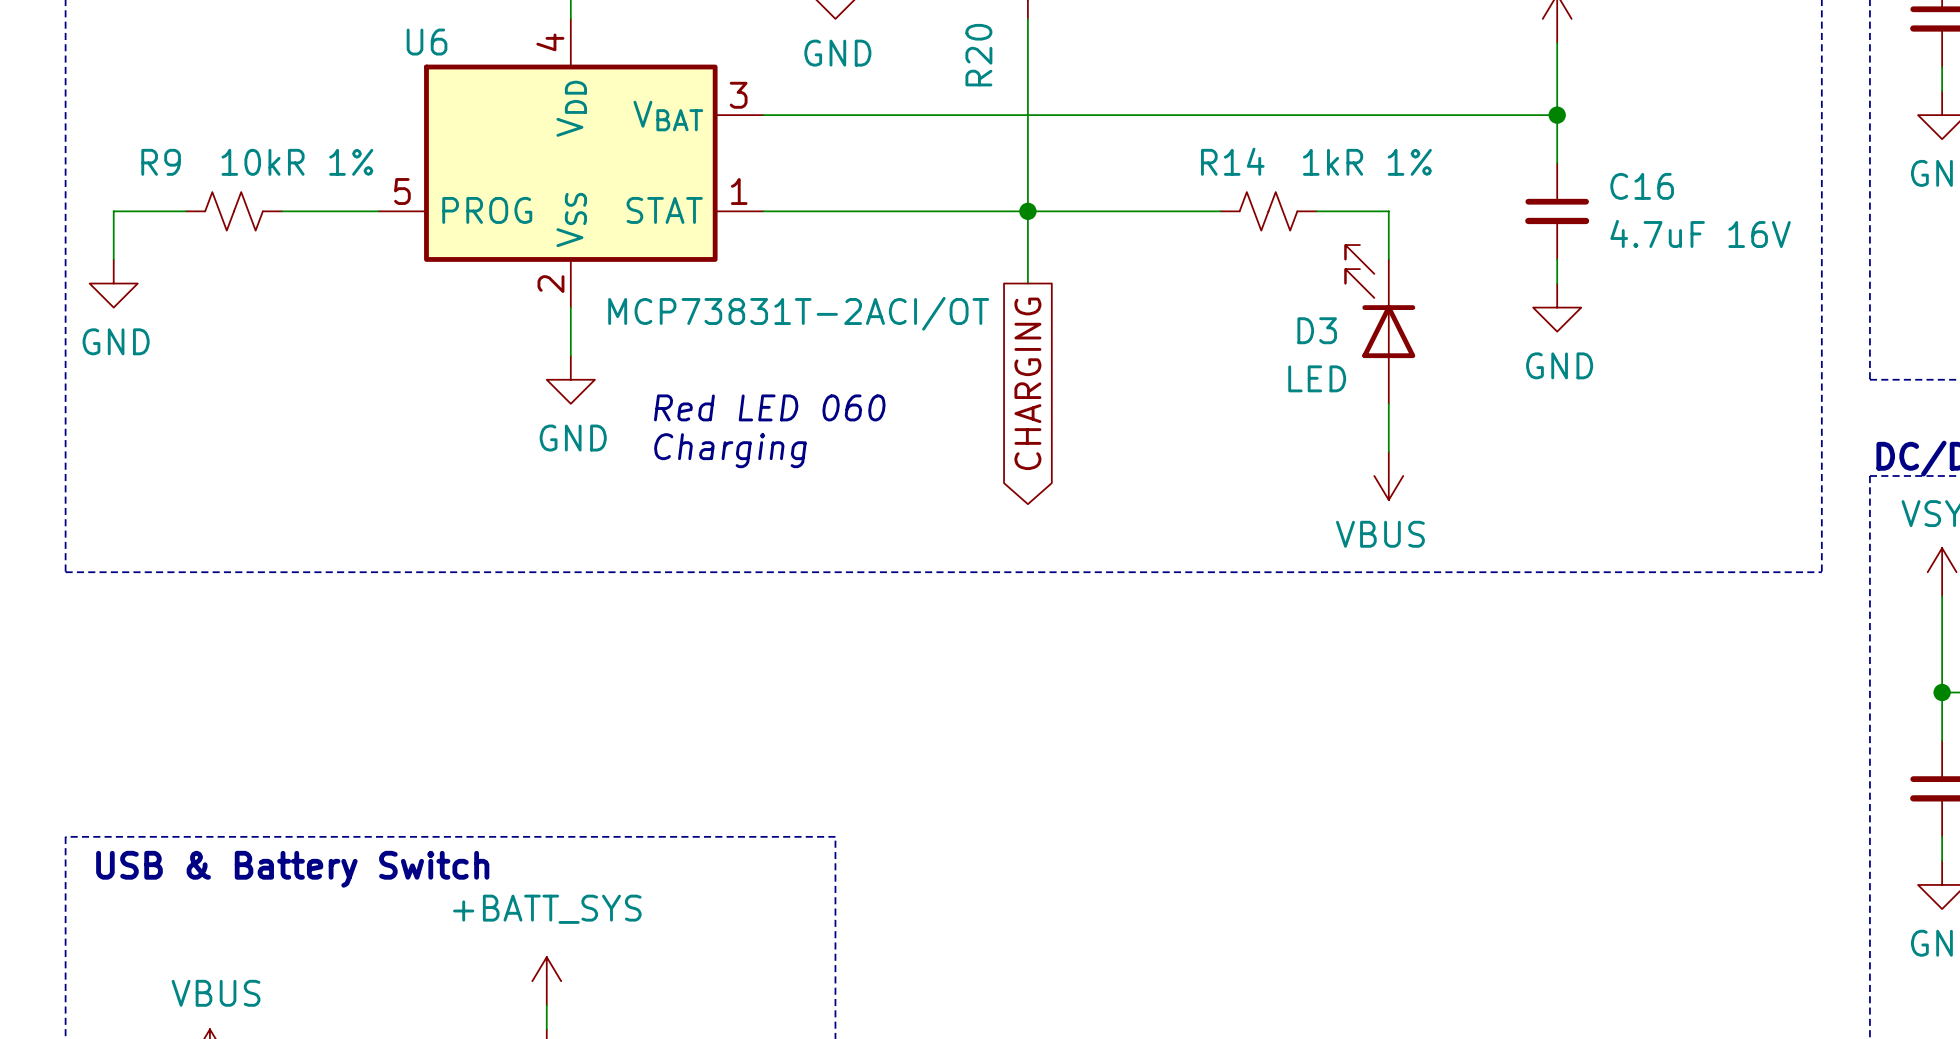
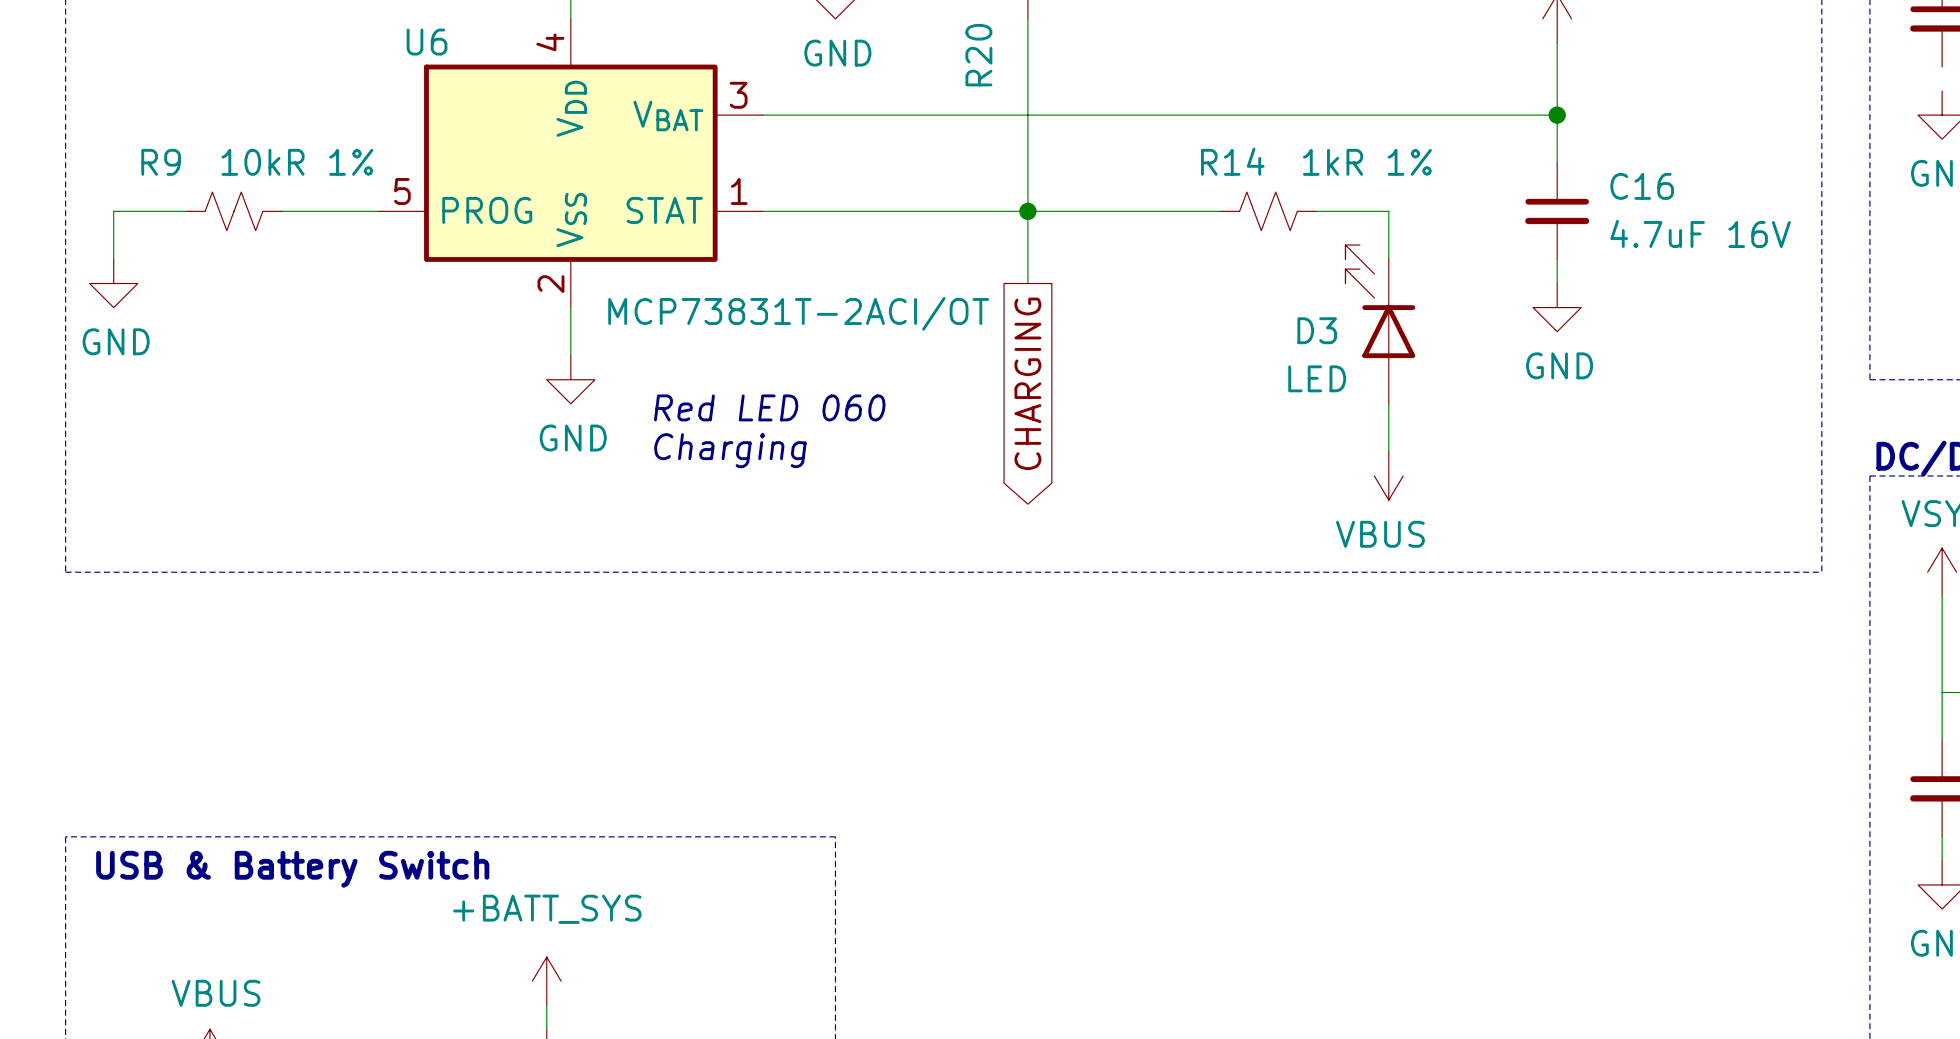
wire: (1942, 67) (1942, 91) -> none
junction: (1942, 692) -> none

